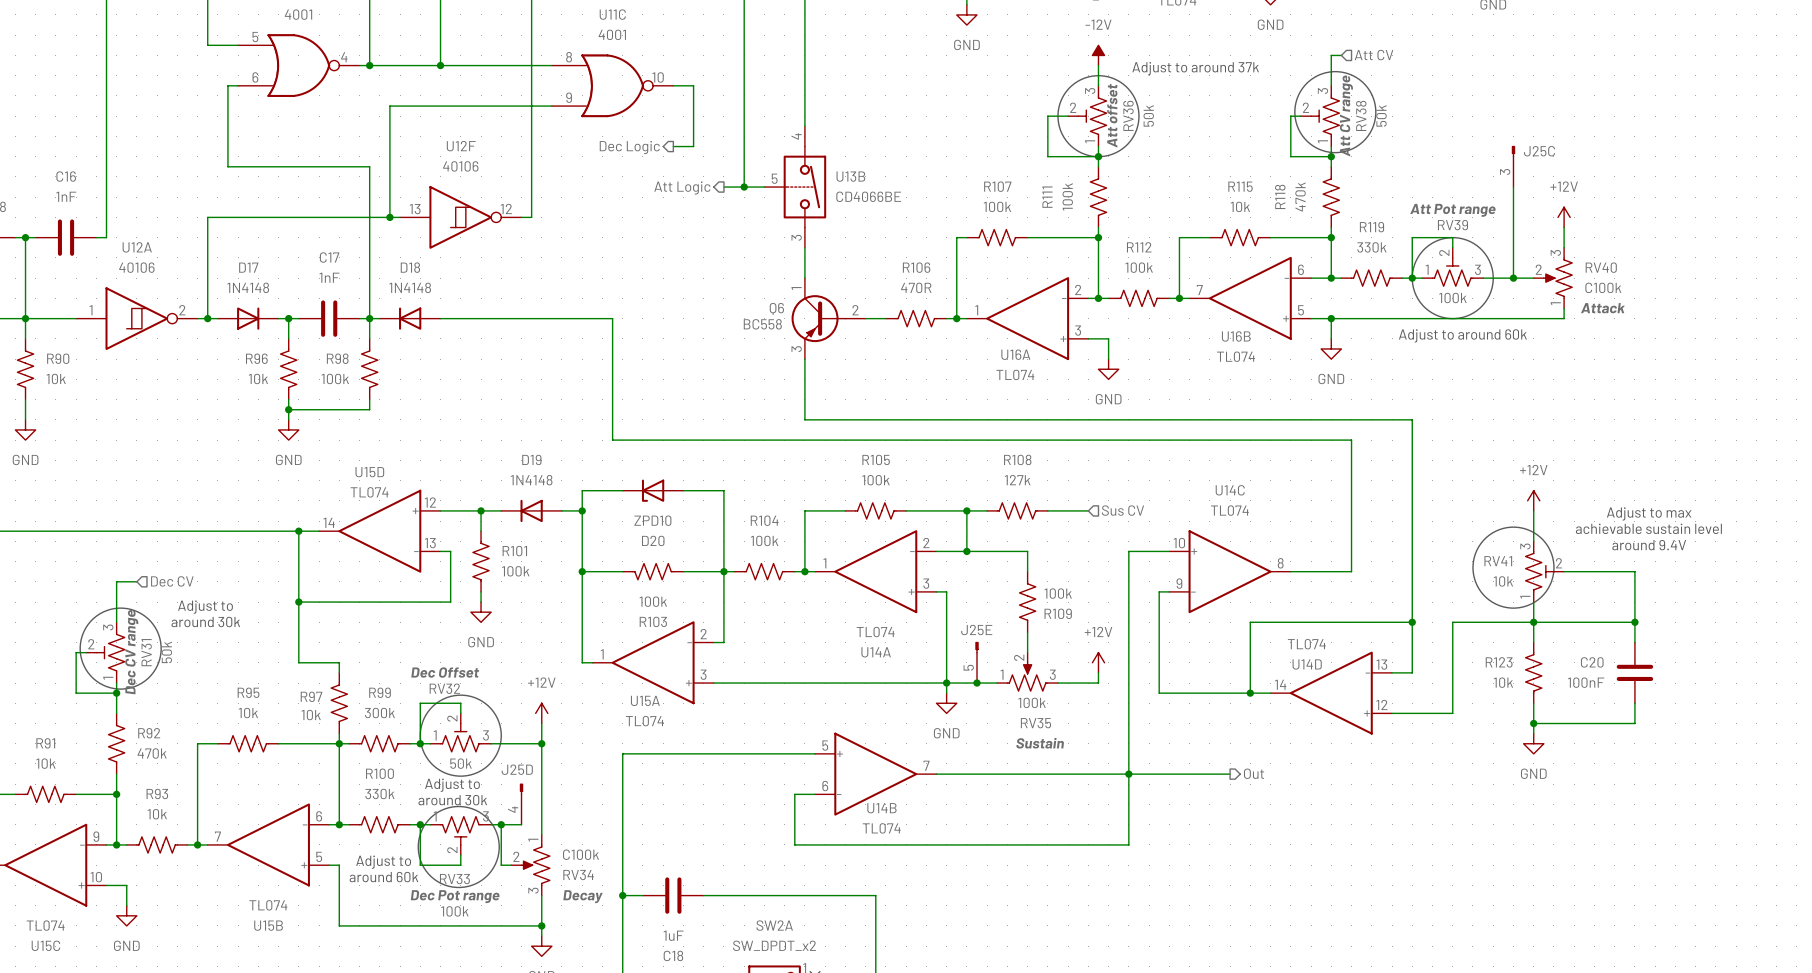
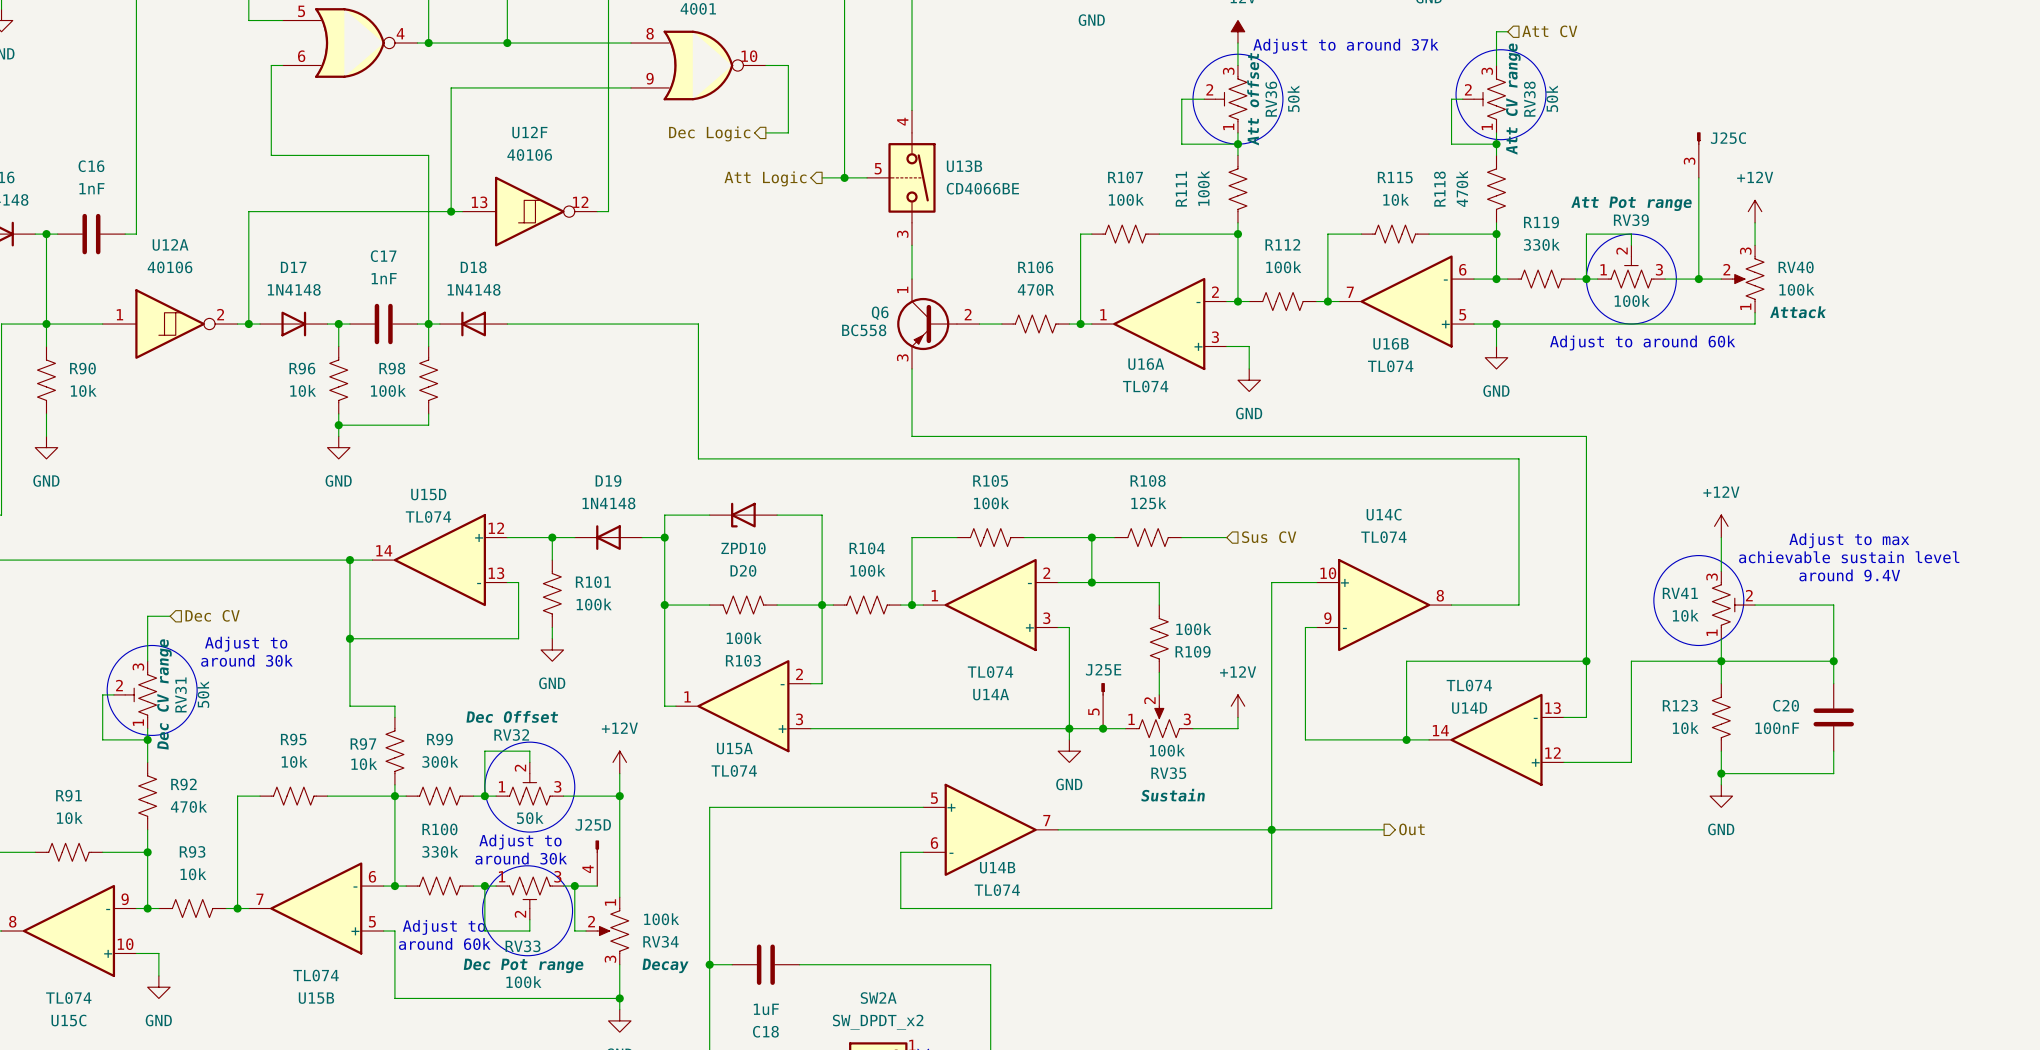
RV40 value: C100k (1603, 287) -> 100k (1796, 289)
R108 value: 127k (1017, 480) -> 125k (1148, 503)
RV34 value: C100k (581, 854) -> 100k (661, 919)

